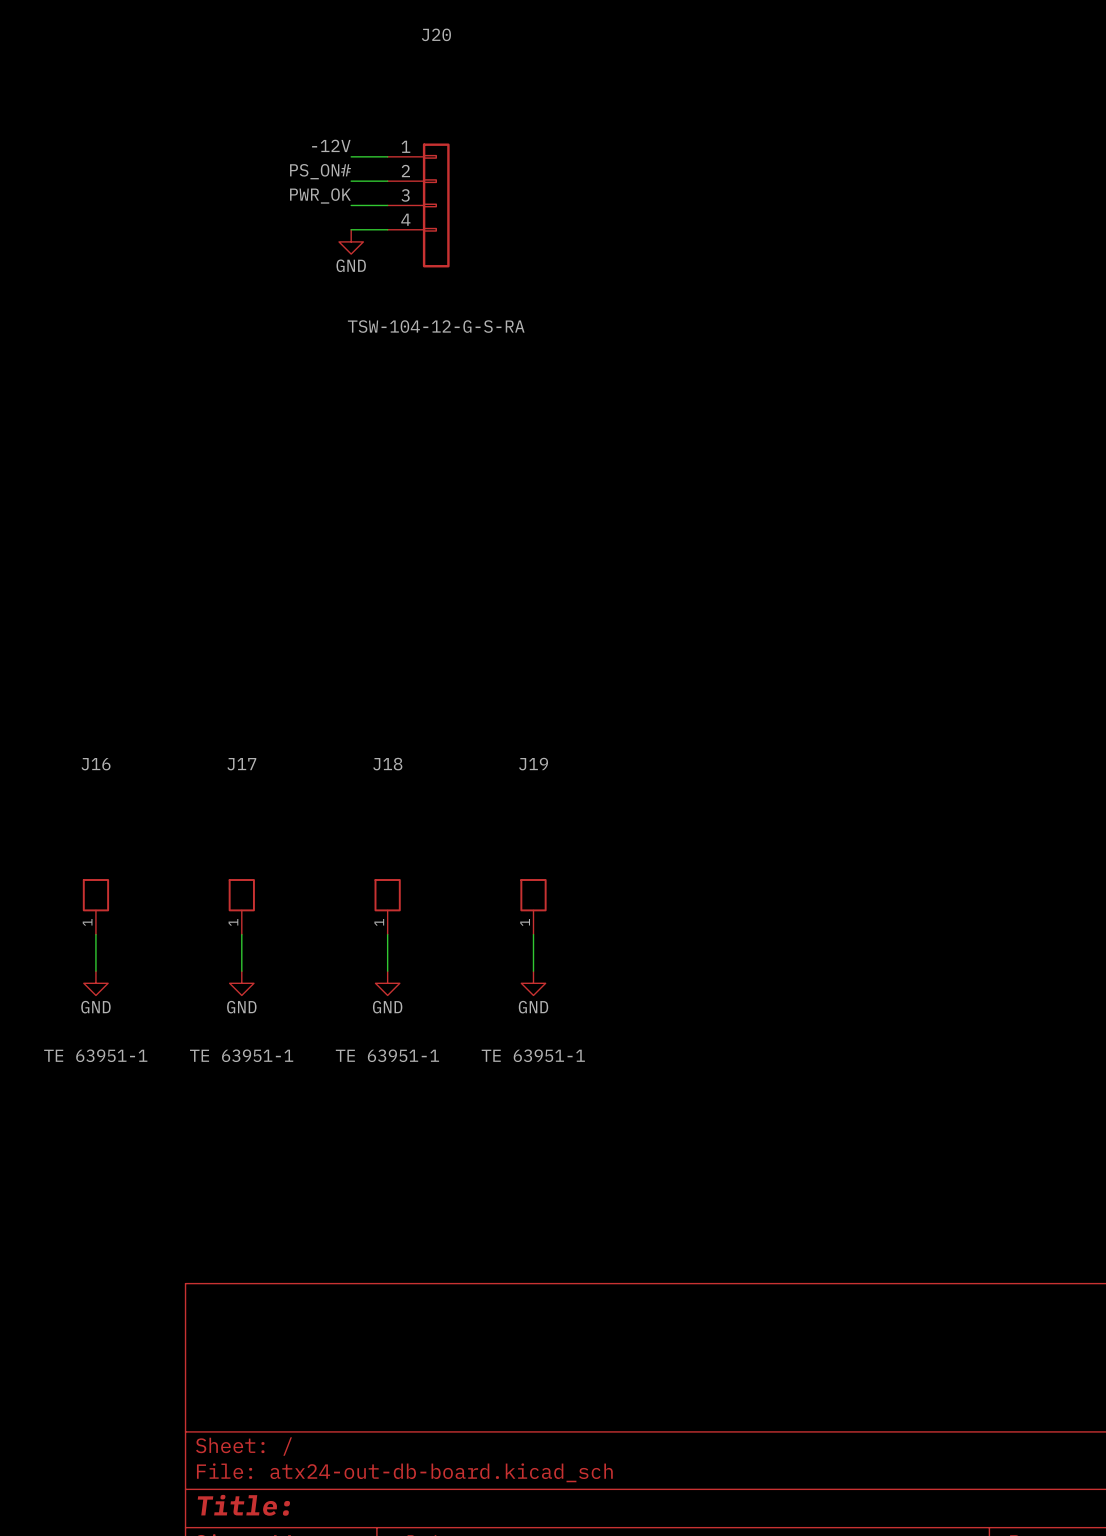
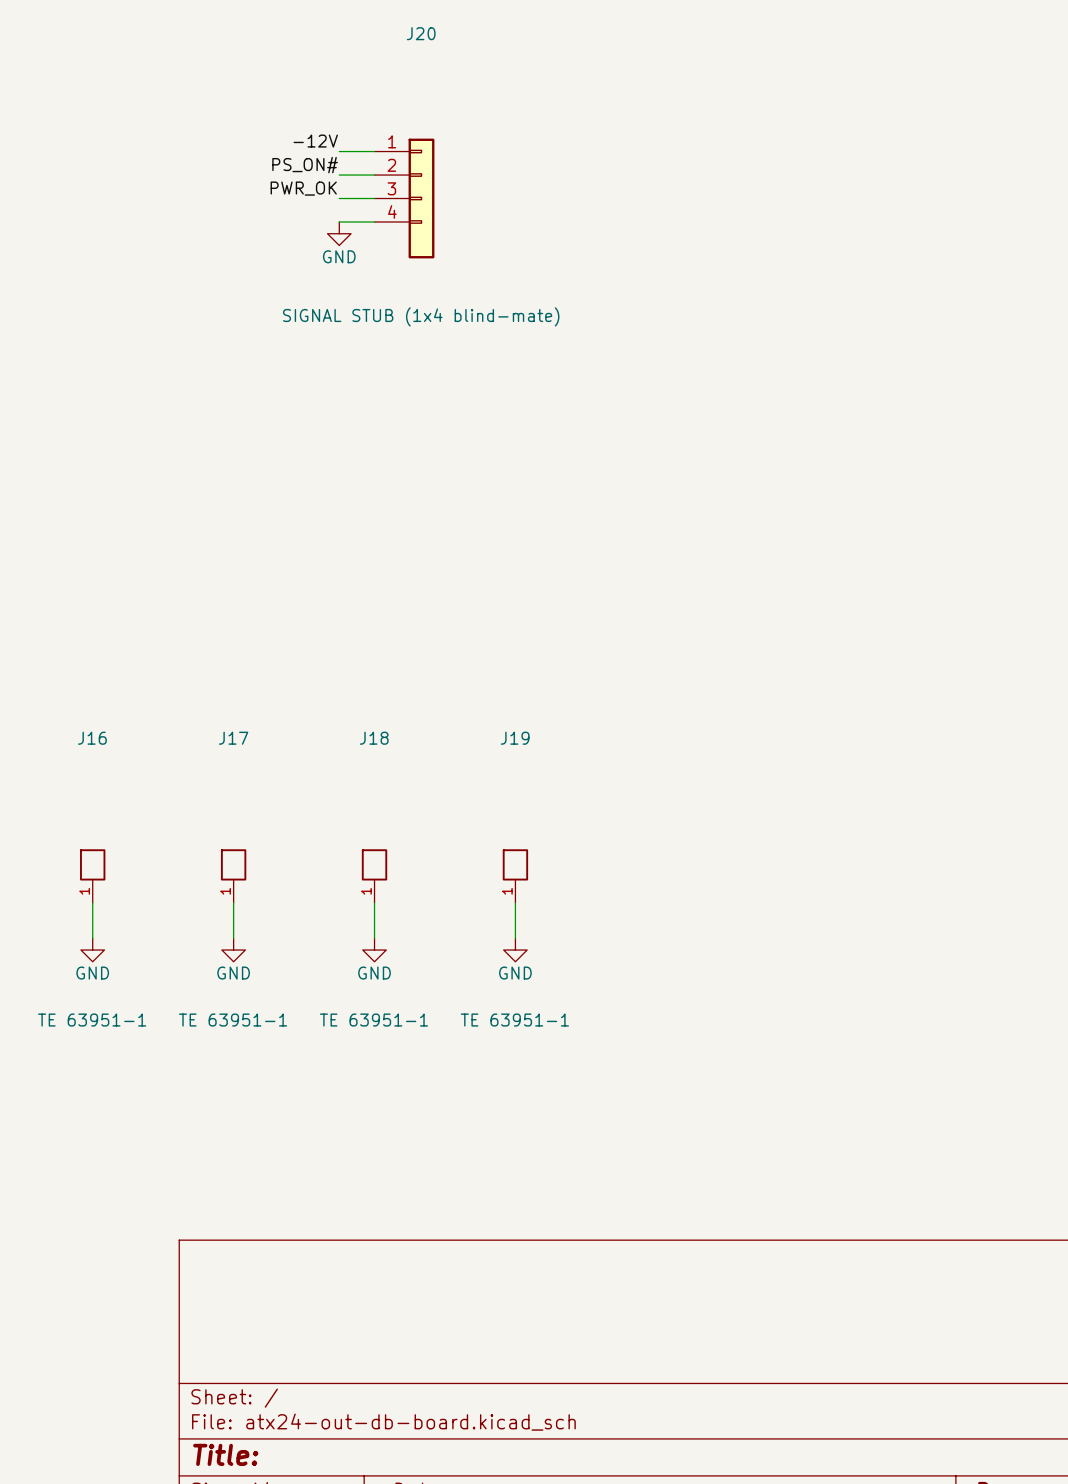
J20 value: TSW-104-12-G-S-RA (436, 326) -> SIGNAL STUB (1x4 blind-mate) (421, 316)

